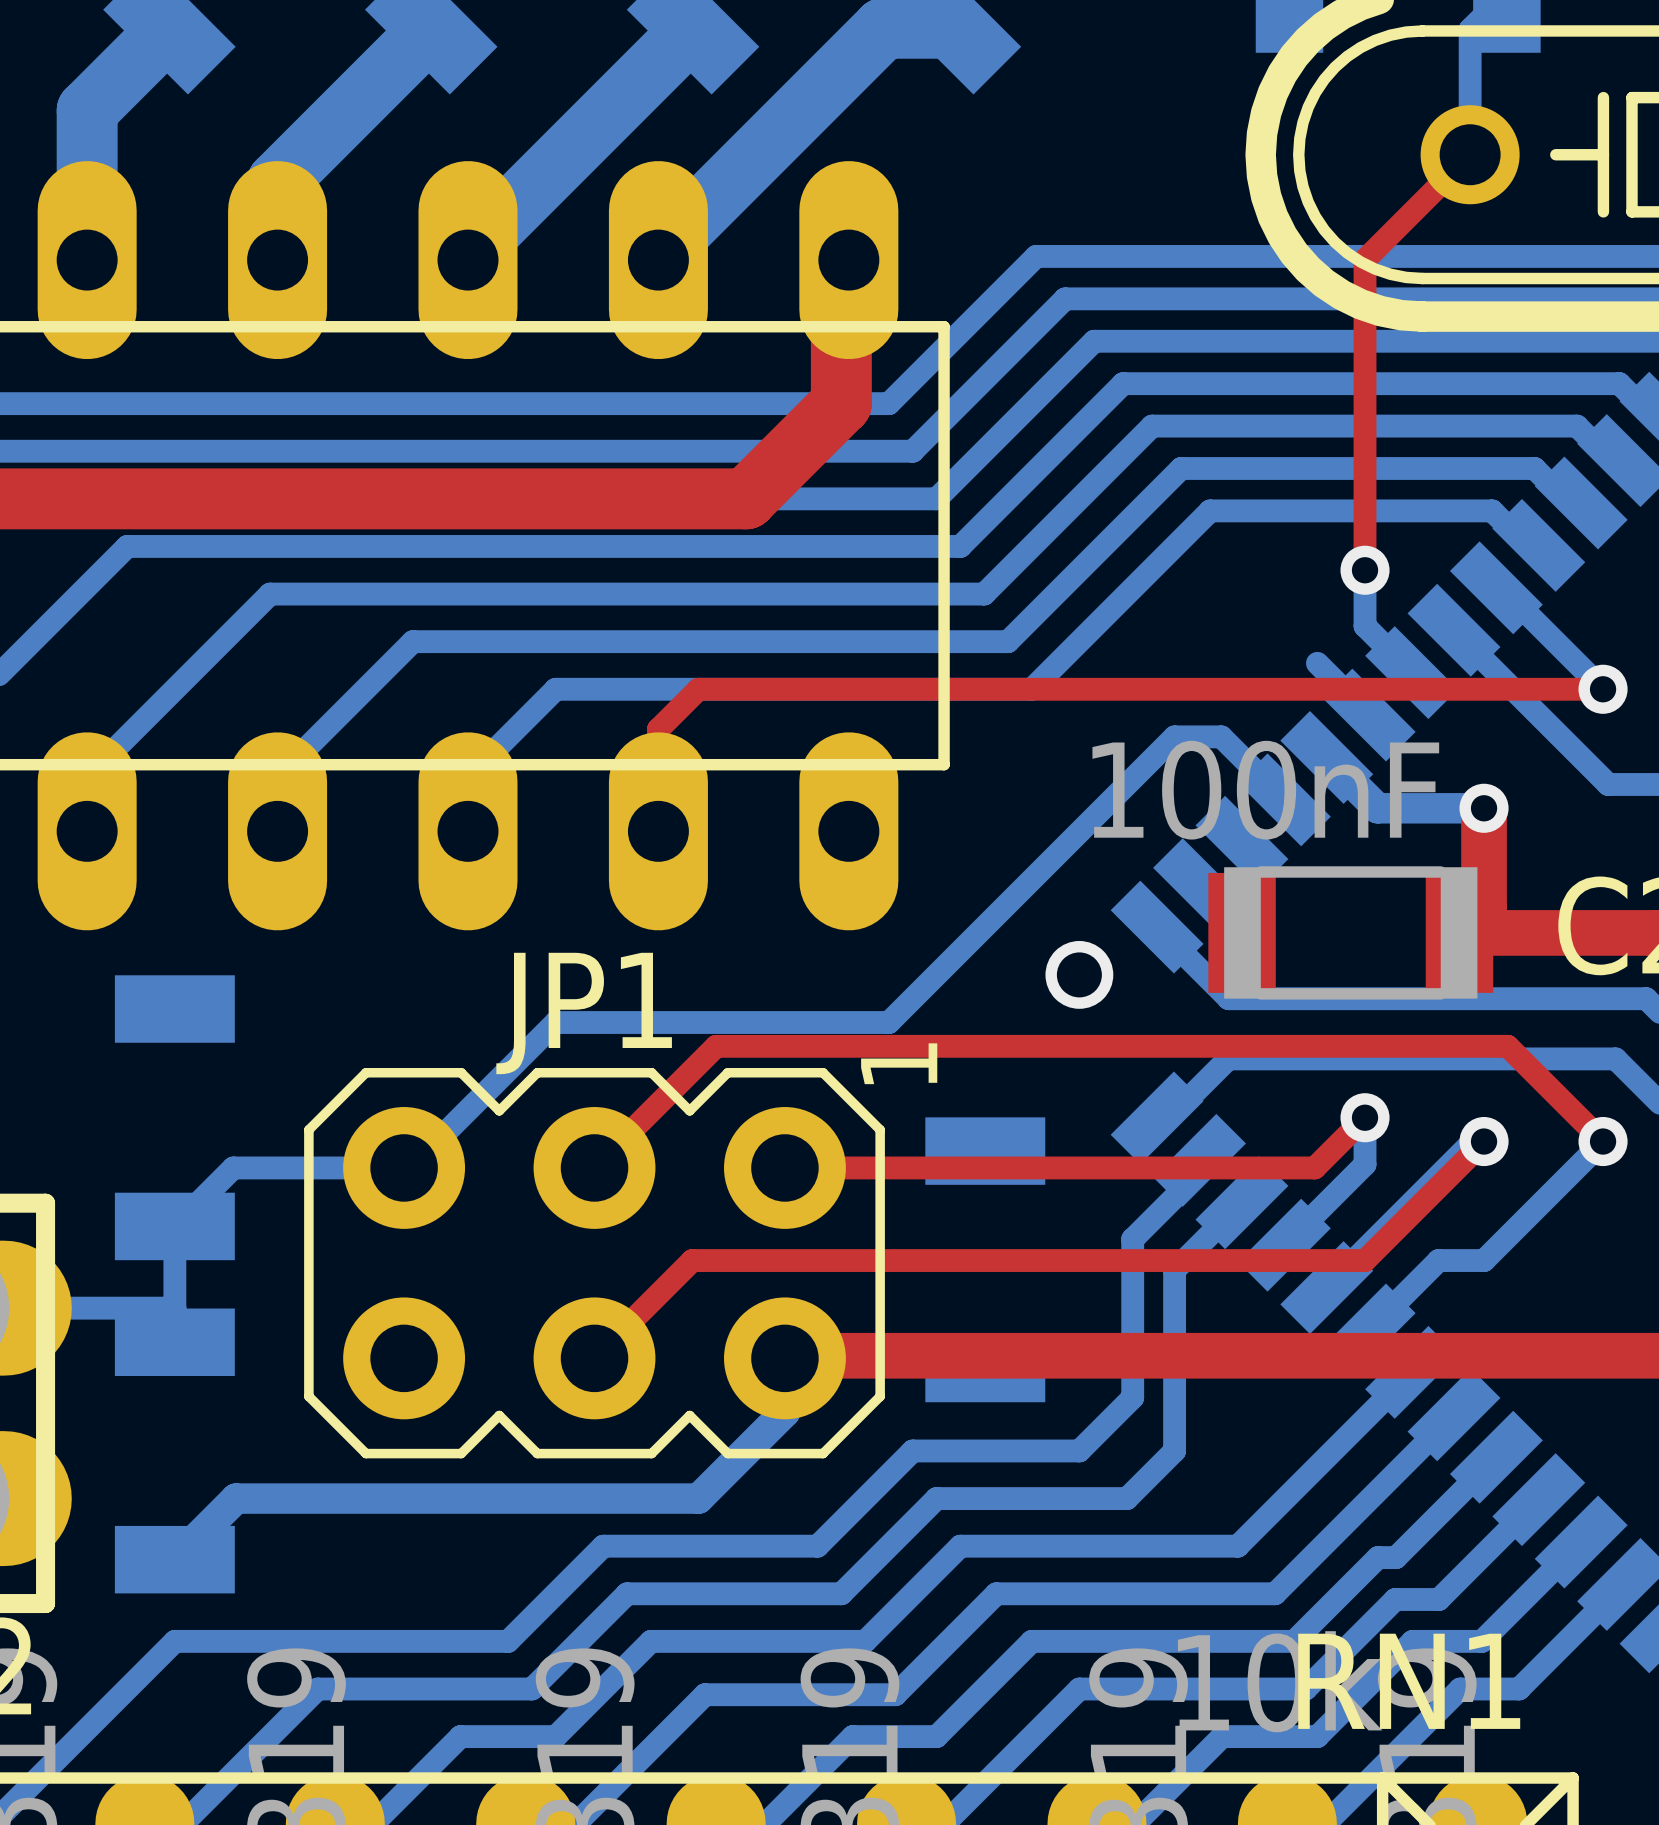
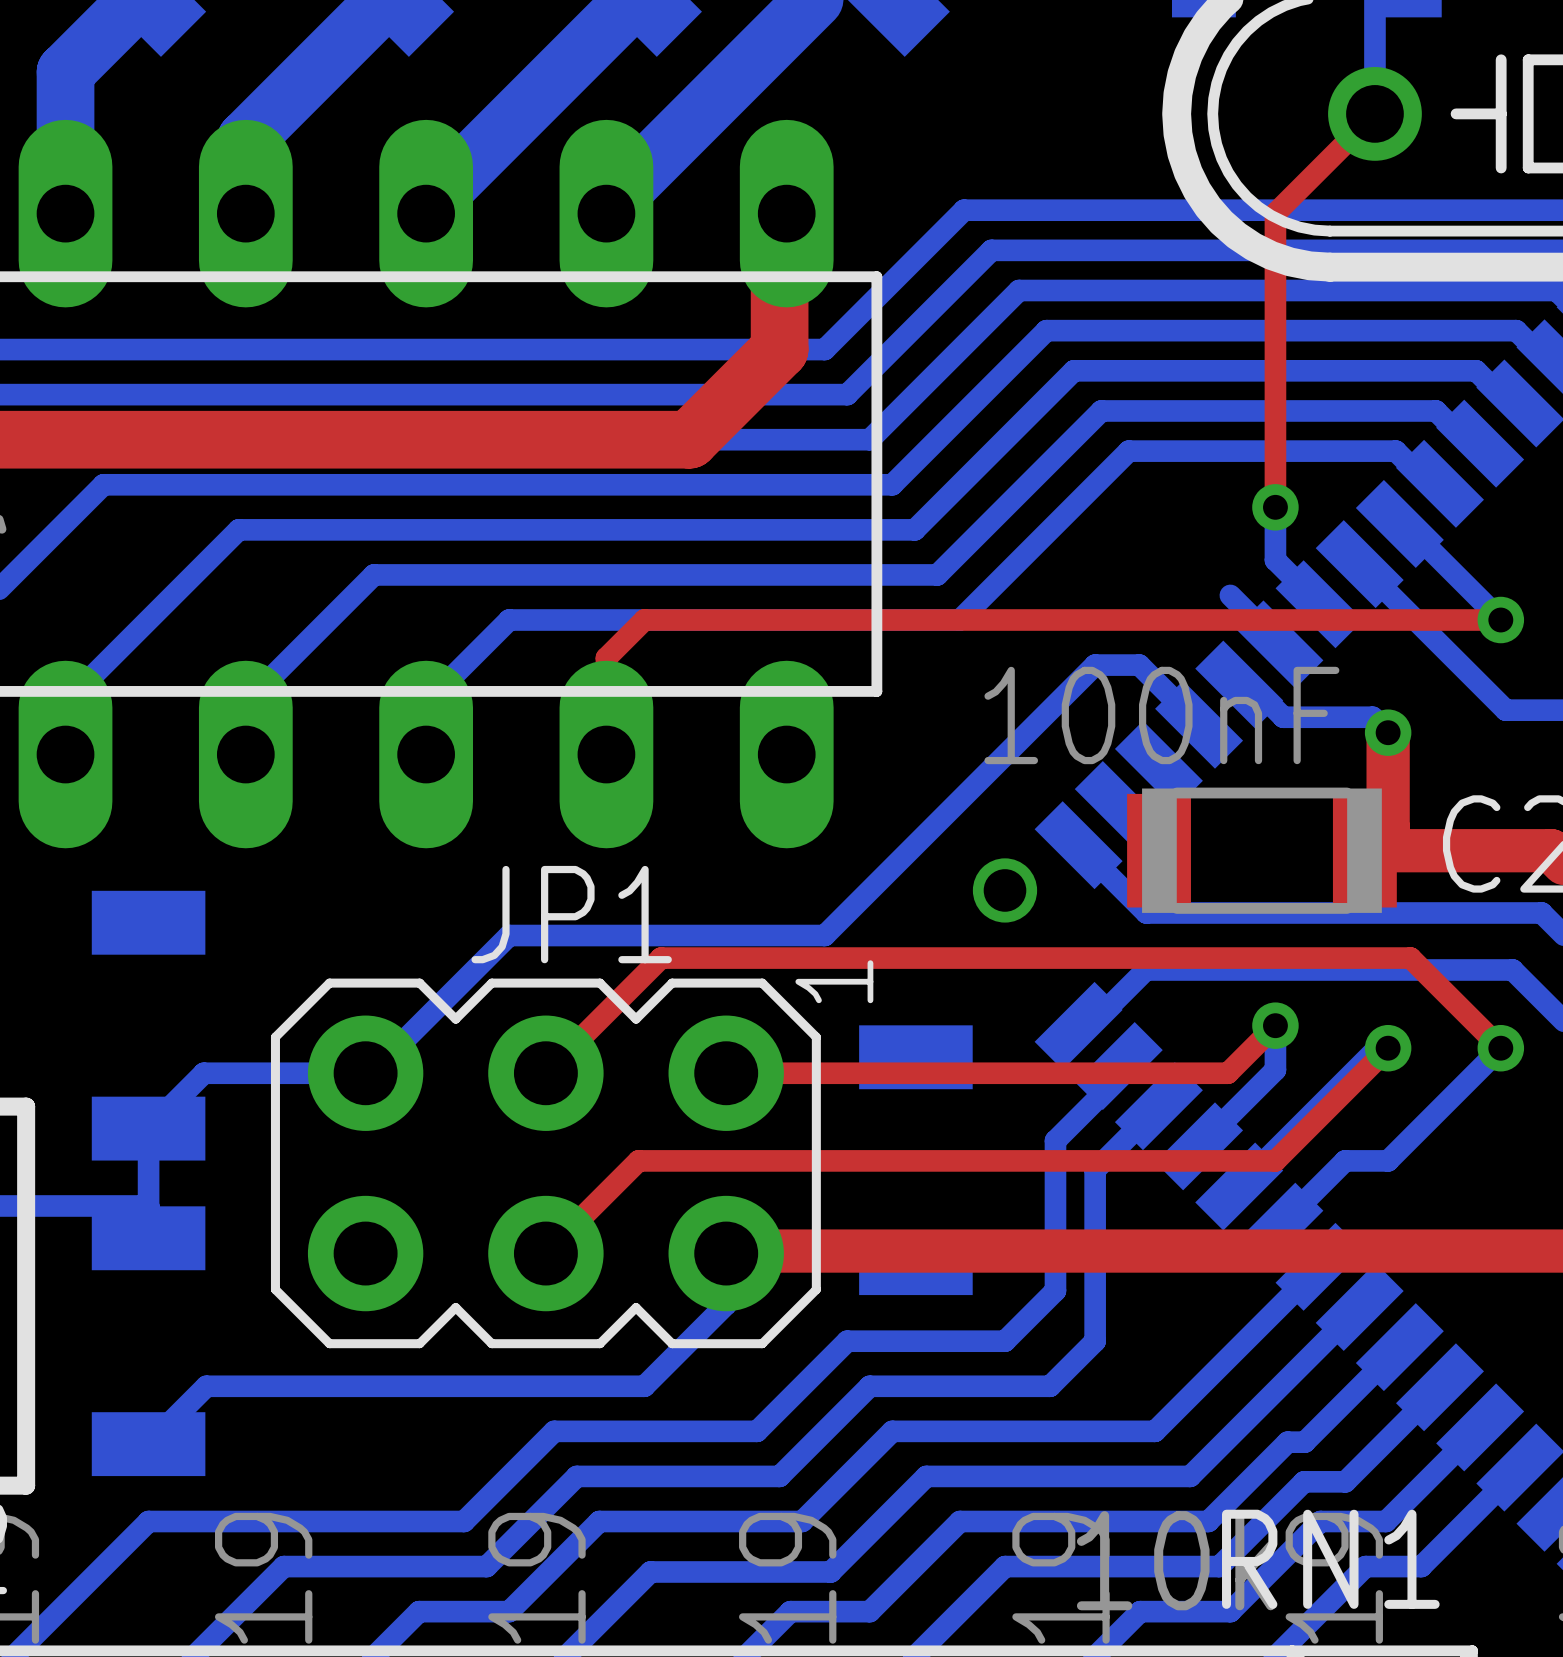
bottom track: (1326, 757) (1377, 808) (1484, 808) -> (1239, 684) (1250, 684) (1283, 717) (1372, 717) (1388, 732)
bottom track width: thick (784, 1358) (784, 1412) (698, 1498) (235, 1498) (174, 1559) -> thin (726, 1253) (726, 1304) (644, 1386) (206, 1386) (148, 1444)

